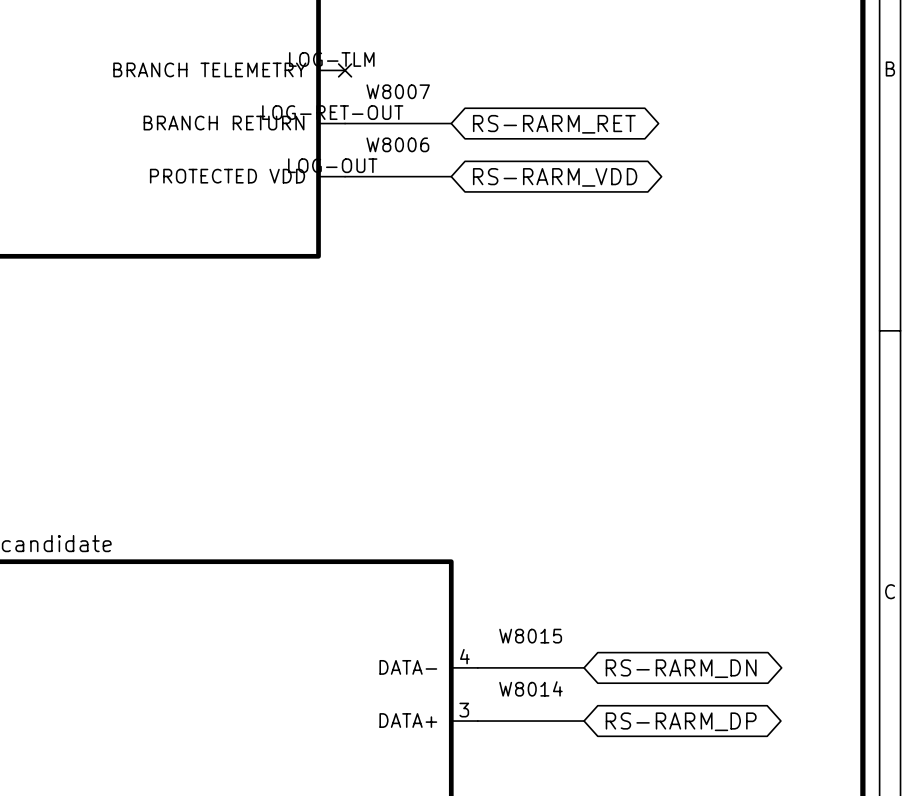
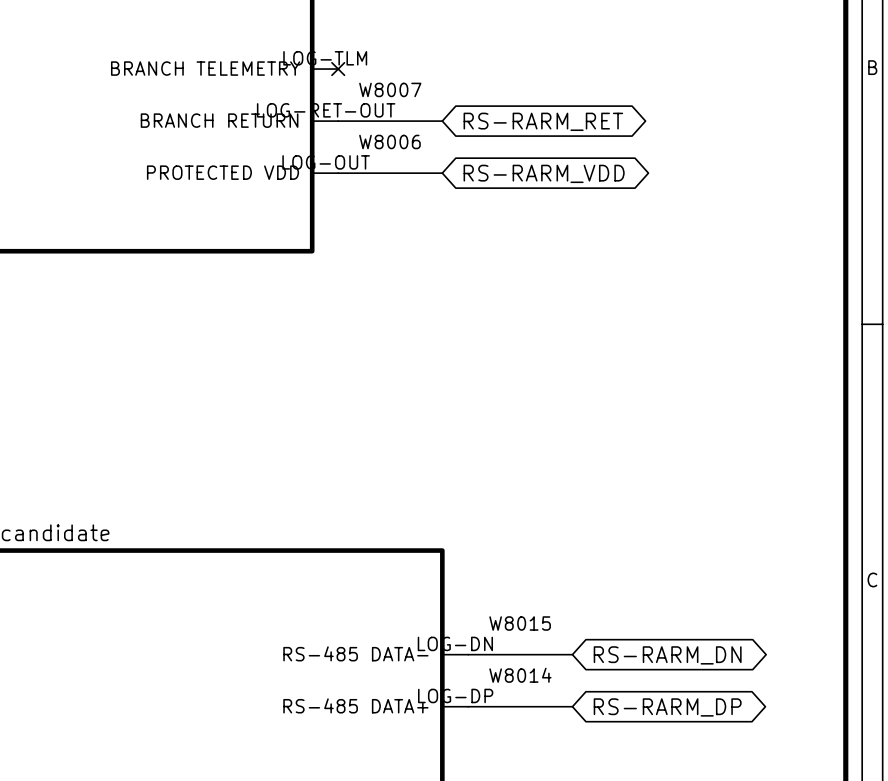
part pin number: 4 (464, 656) -> LOG-DN (455, 643)
part pin name: DATA- (408, 667) -> RS-485 DATA- (355, 653)
part pin number: 3 (464, 710) -> LOG-DP (455, 695)
part pin name: DATA+ (408, 720) -> RS-485 DATA+ (355, 705)

